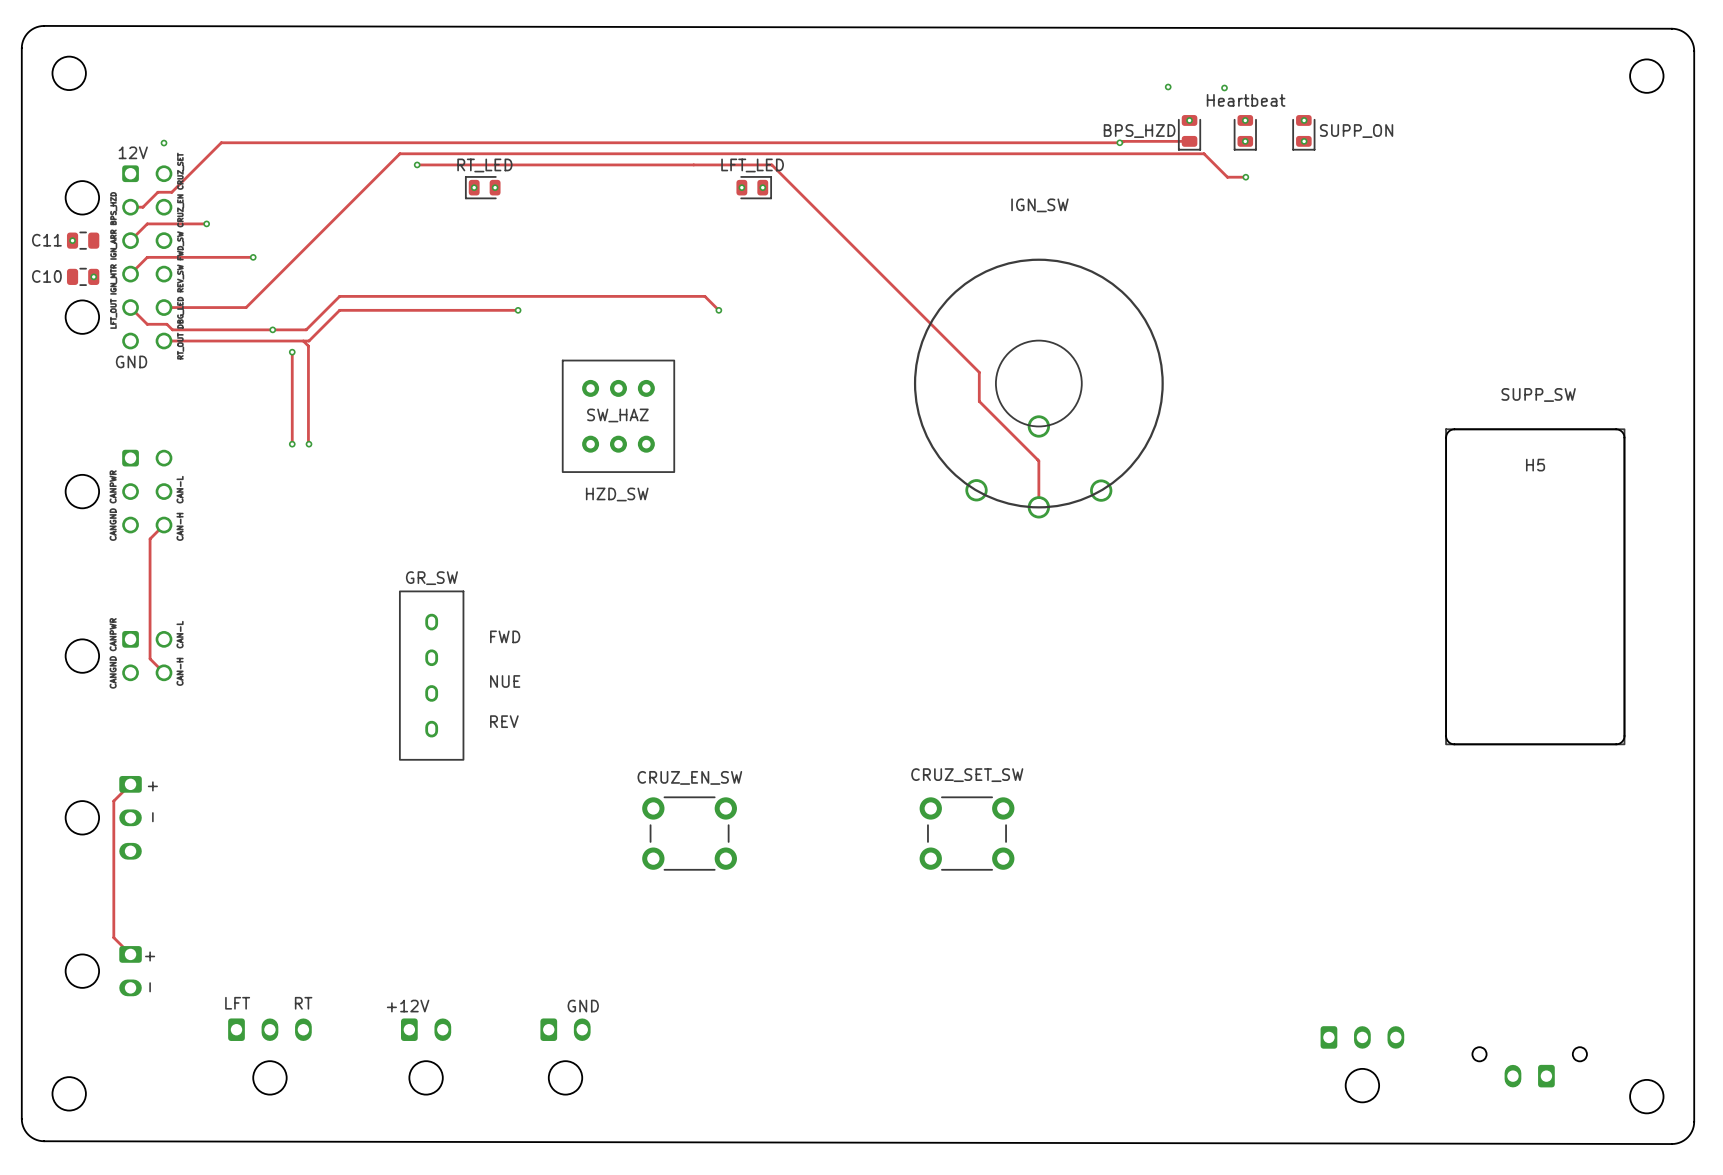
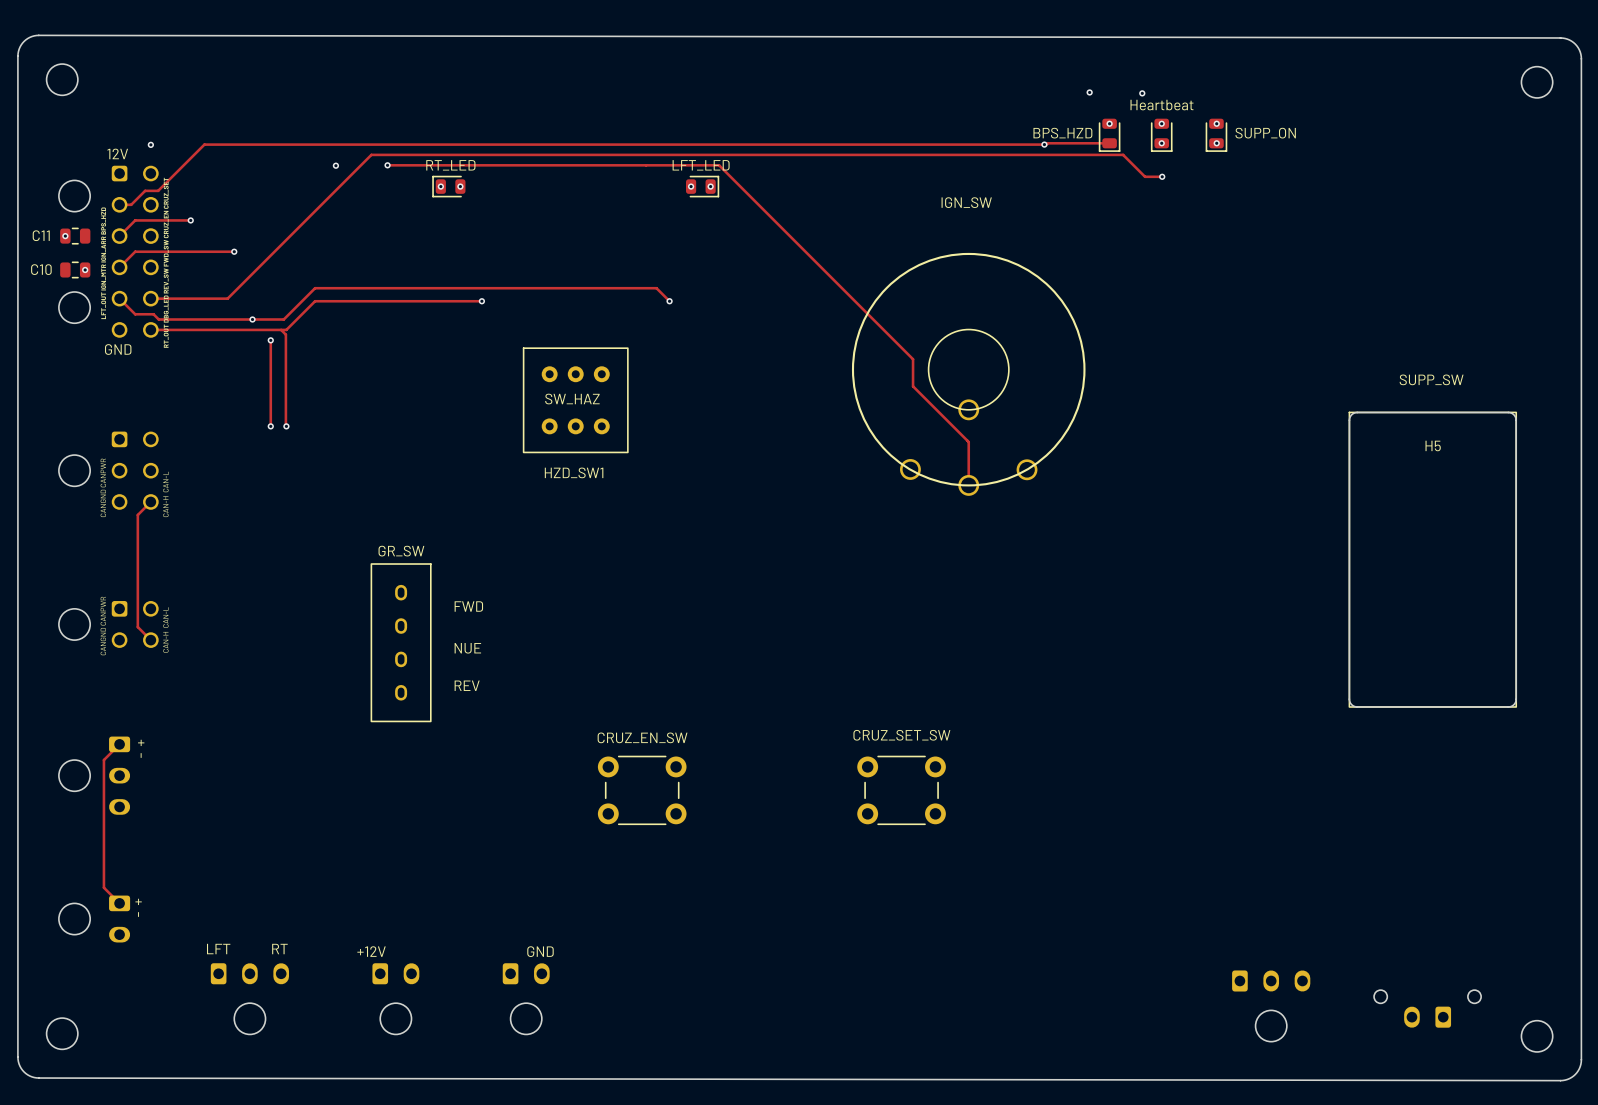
via: none -> (335, 165)
HZD_SW name: HZD_SW (617, 494) -> HZD_SW1 (574, 472)

